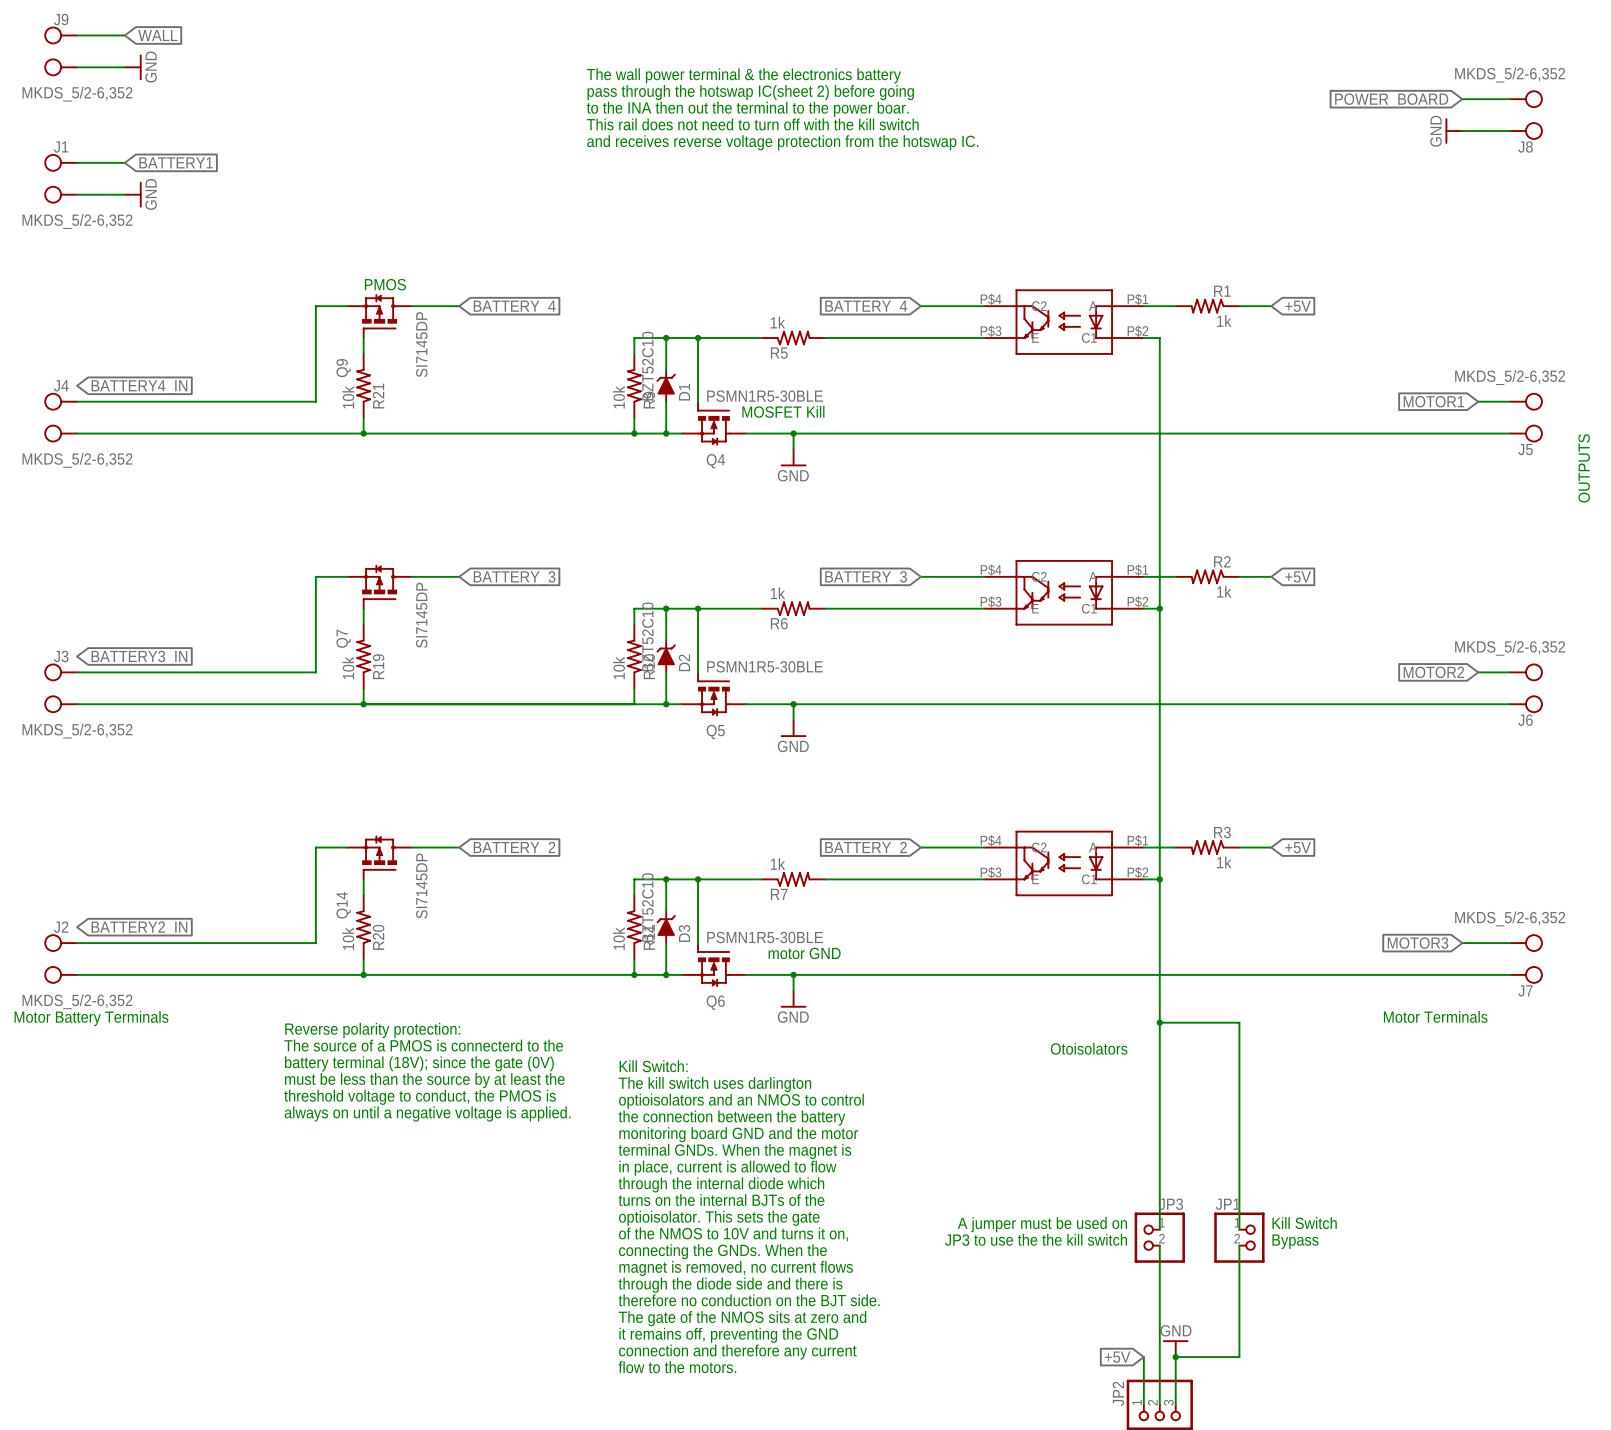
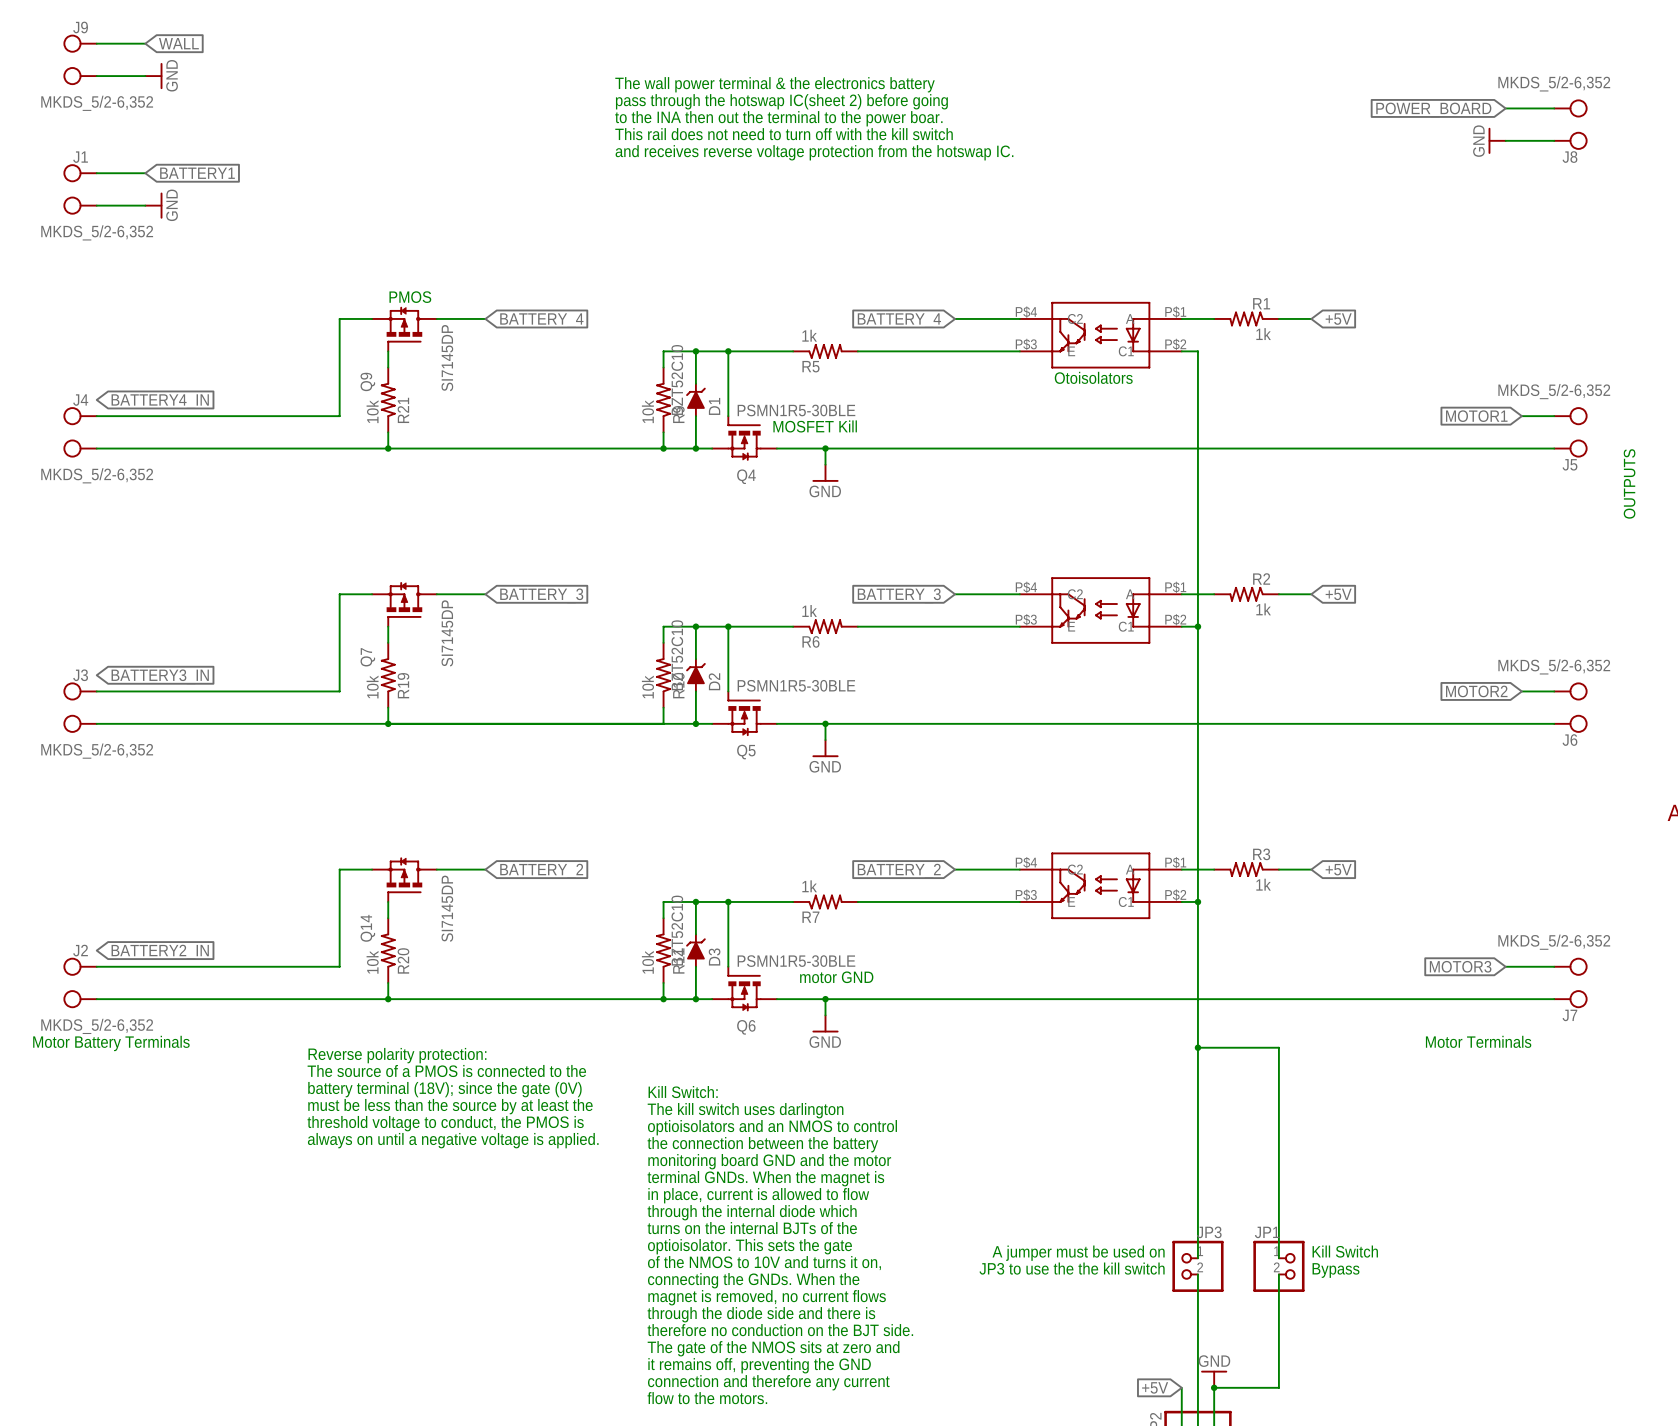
text: none -> Otoisolators (1093, 377)
text: The source of a PMOS is connecterd to the (423, 1045) -> The source of a PMOS is connected to the (446, 1071)
text: Otoisolators (1089, 1048) -> none

